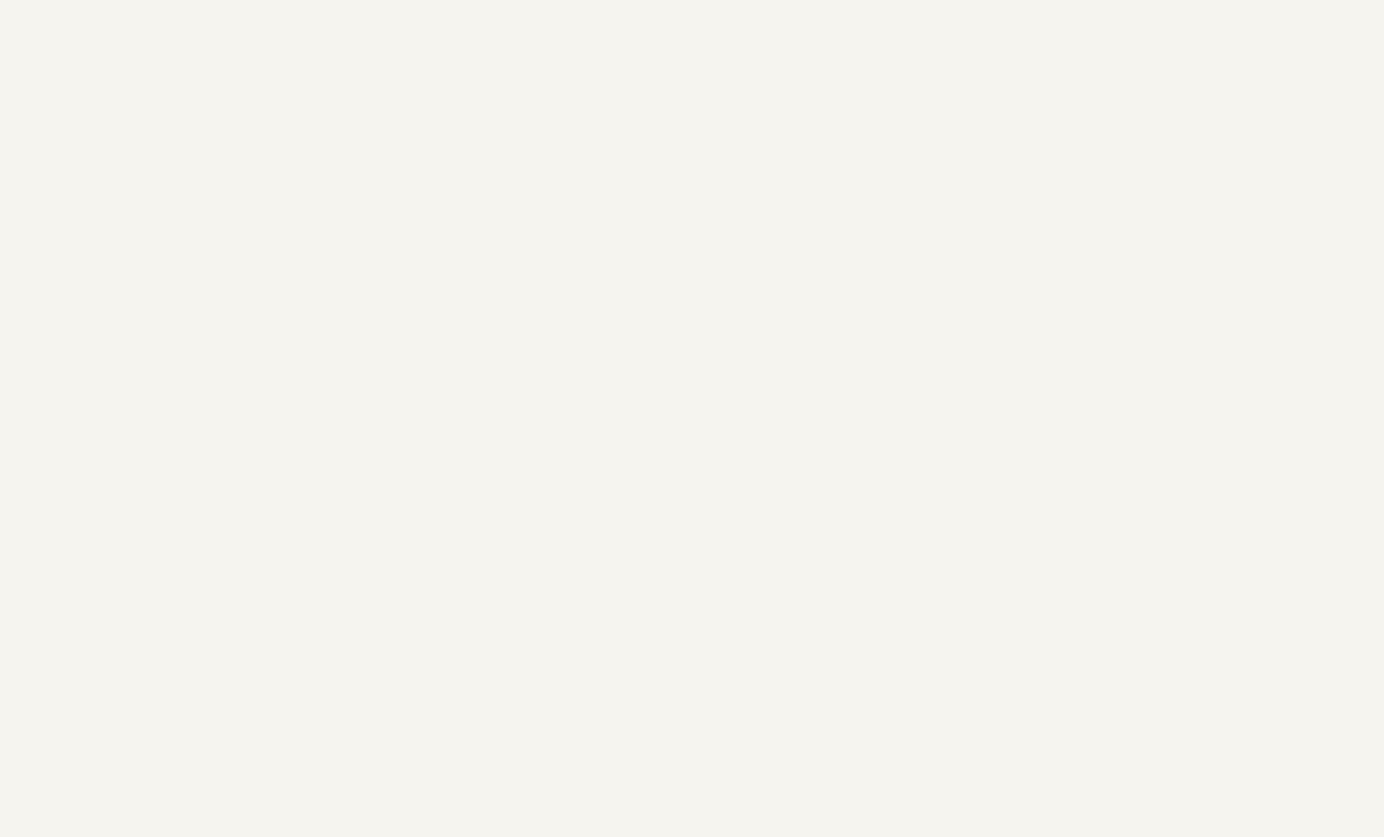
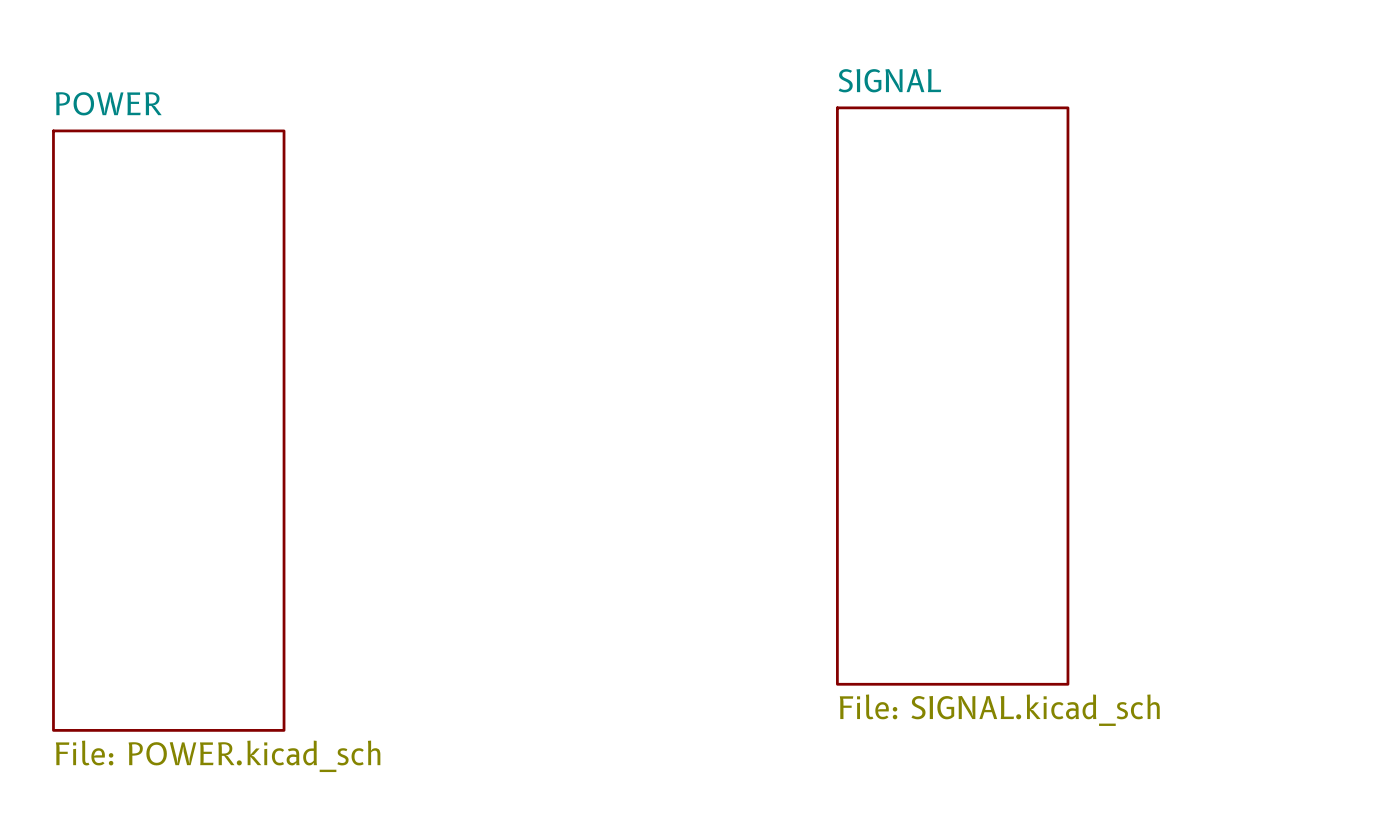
sheet SIGNAL: none -> File: SIGNAL.kicad_sch (952, 396)
sheet POWER: none -> File: POWER.kicad_sch (168, 430)

